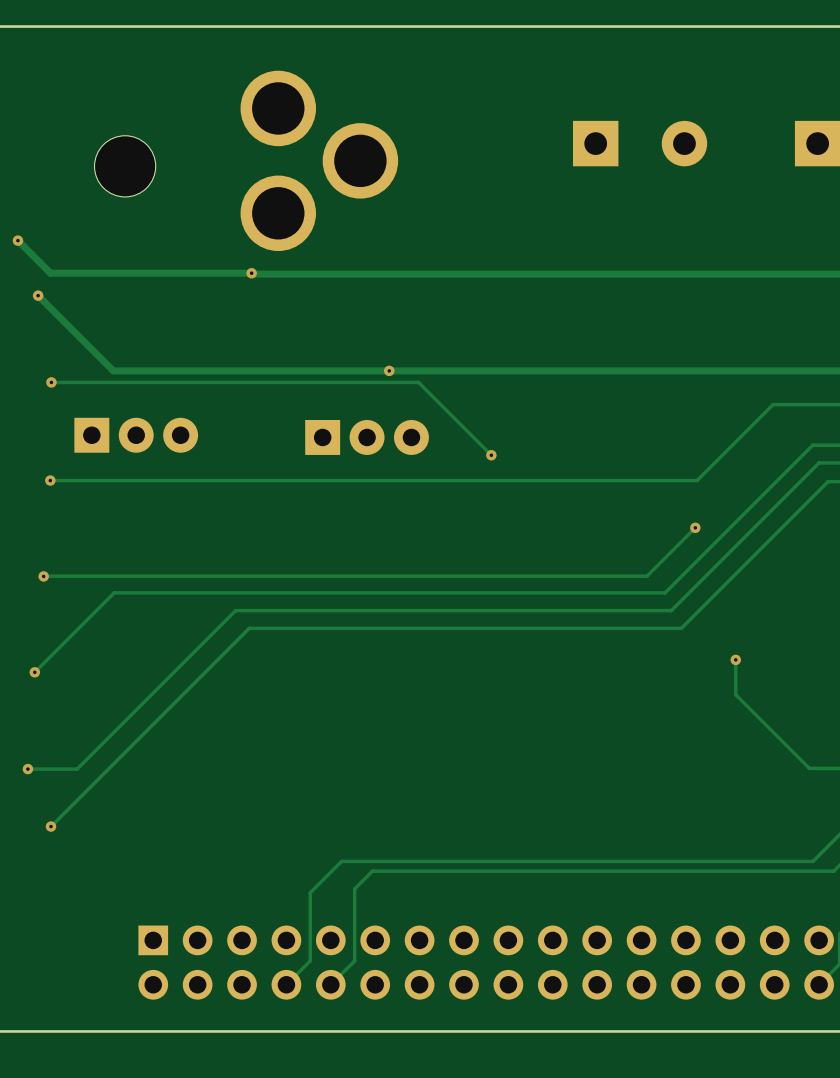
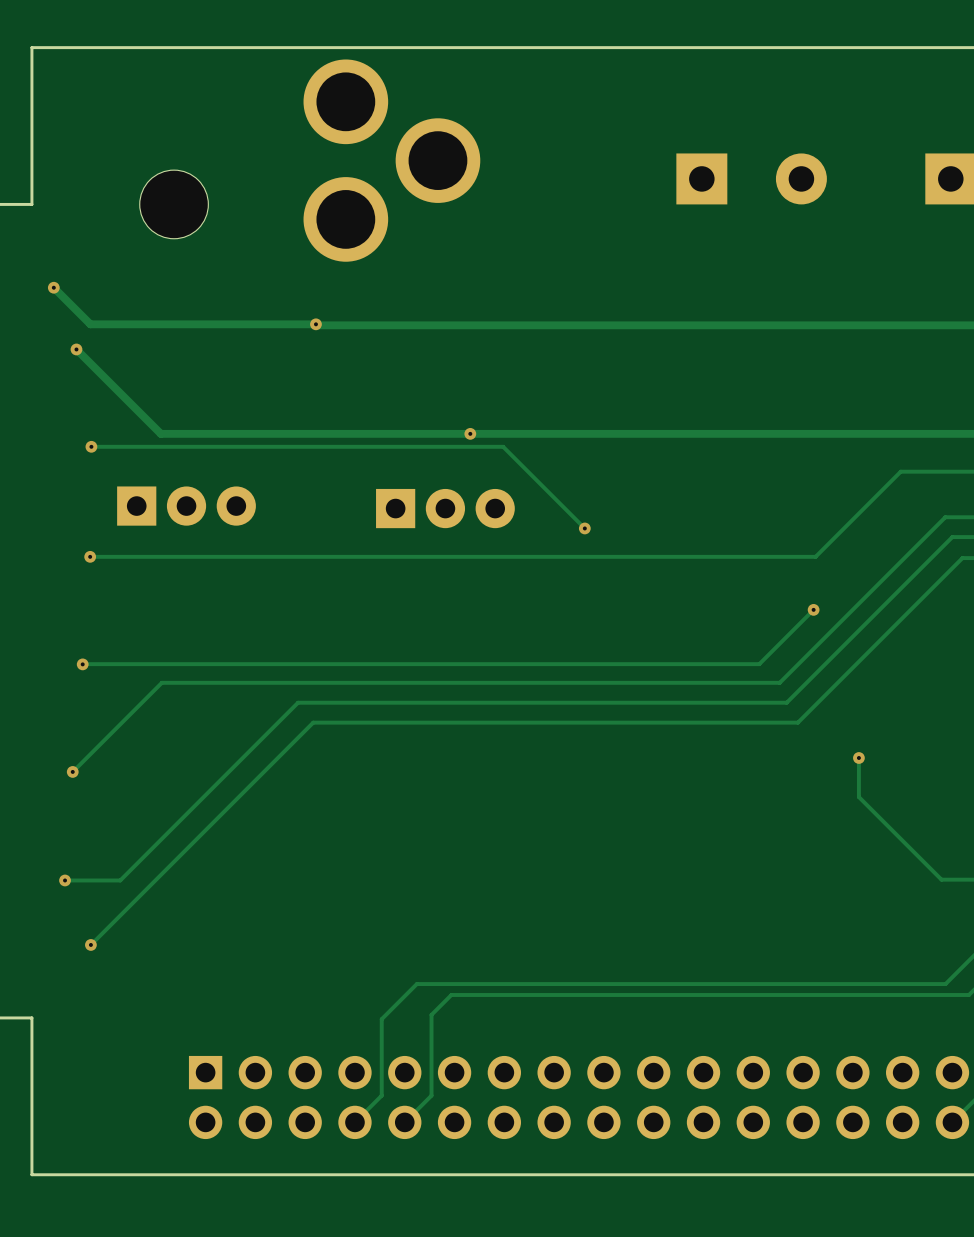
part position: (319, 160) -> (391, 160)

